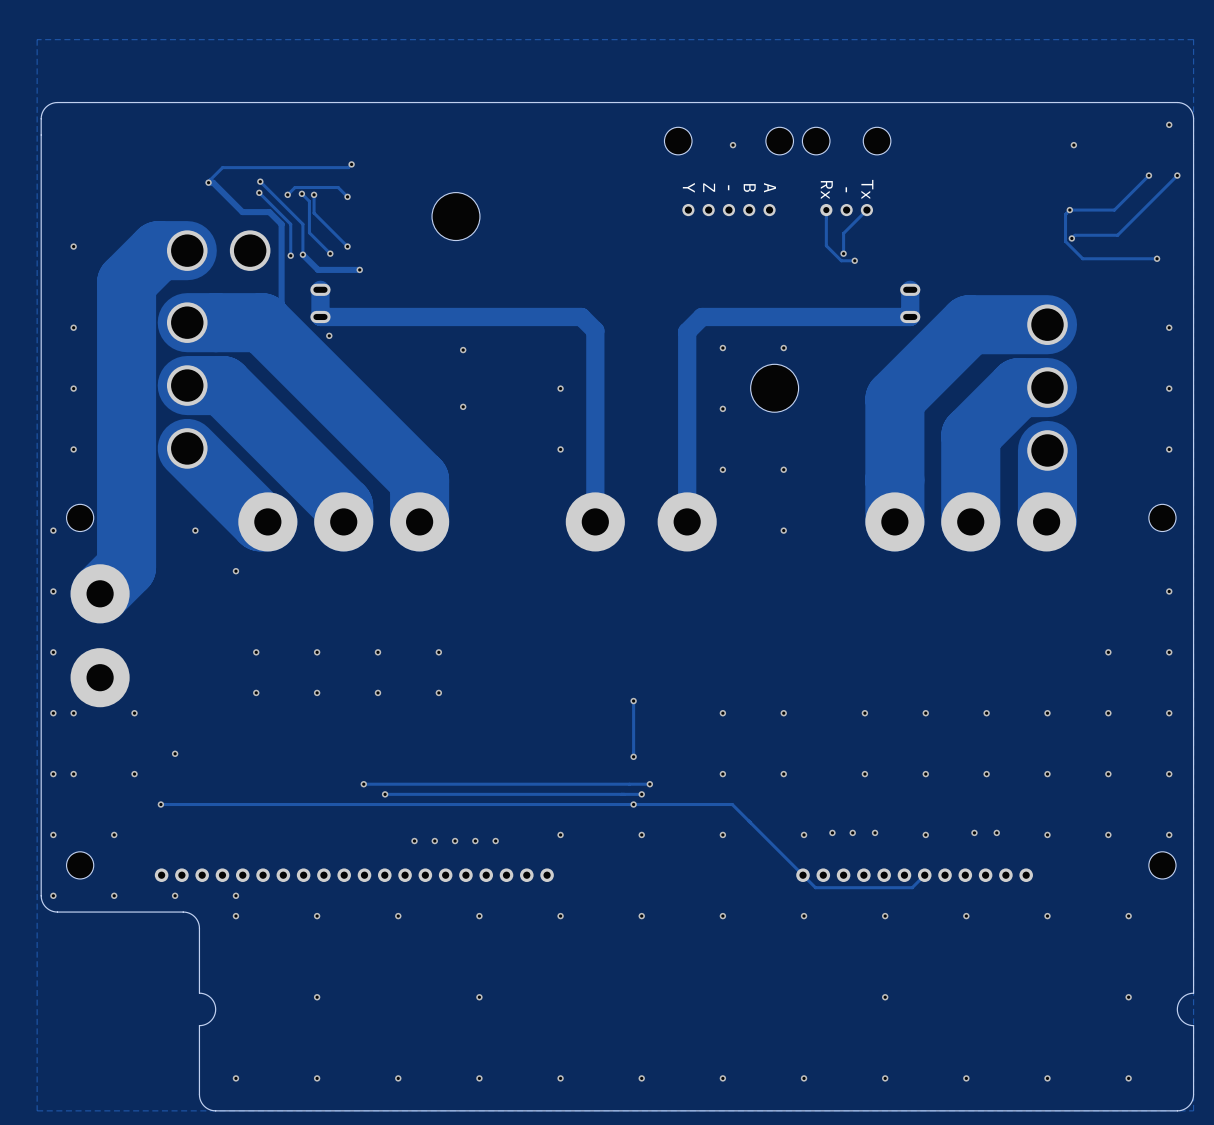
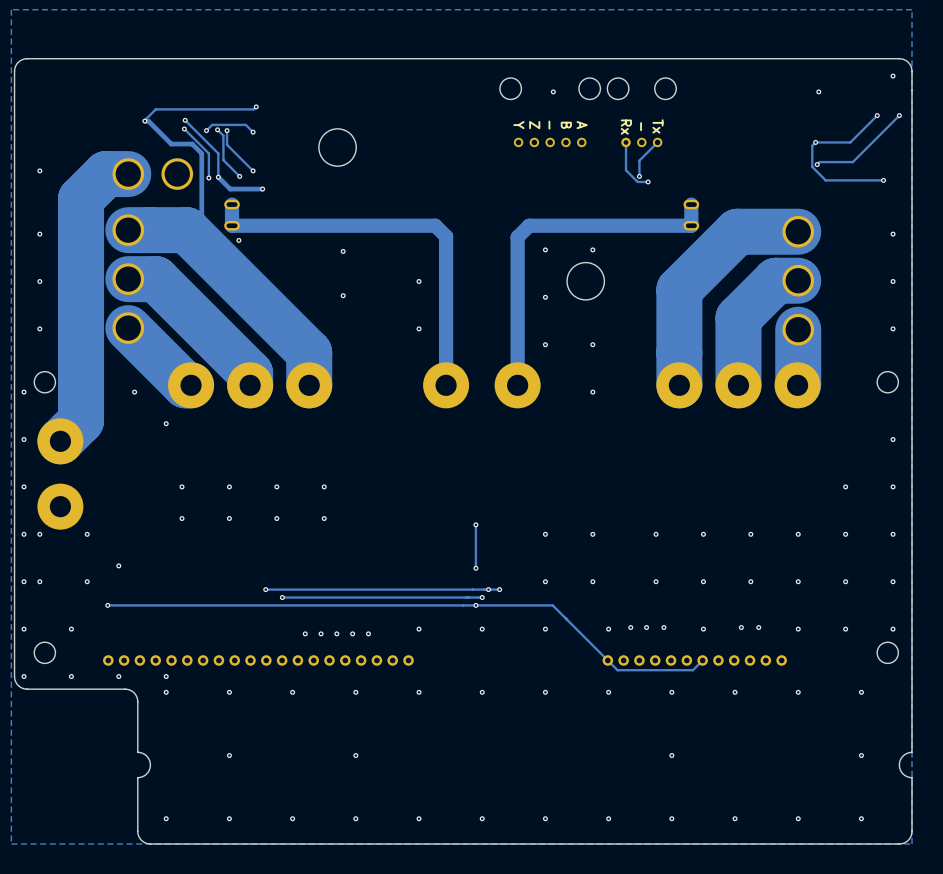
track: none -> (499, 589) (488, 589)
via: none -> (499, 589)

